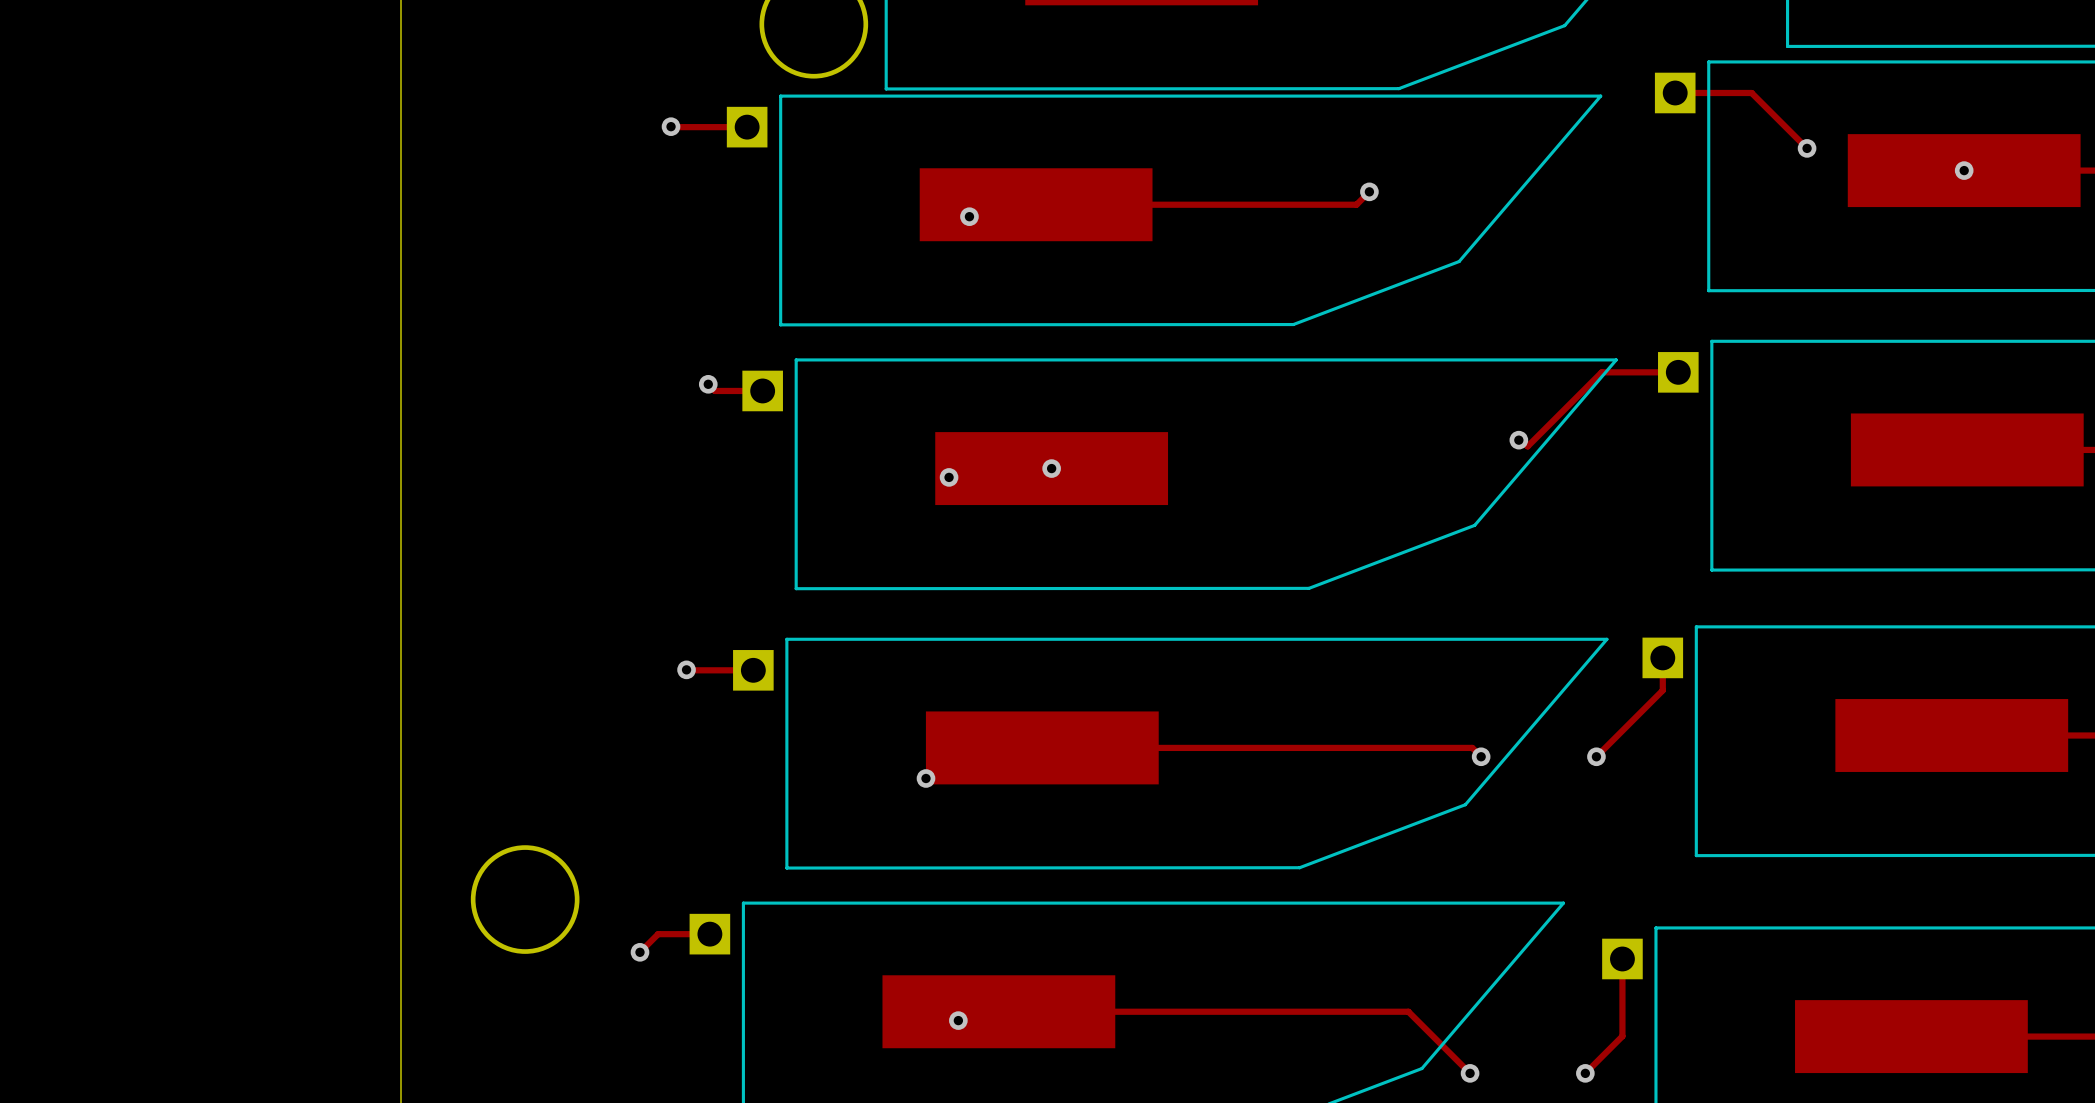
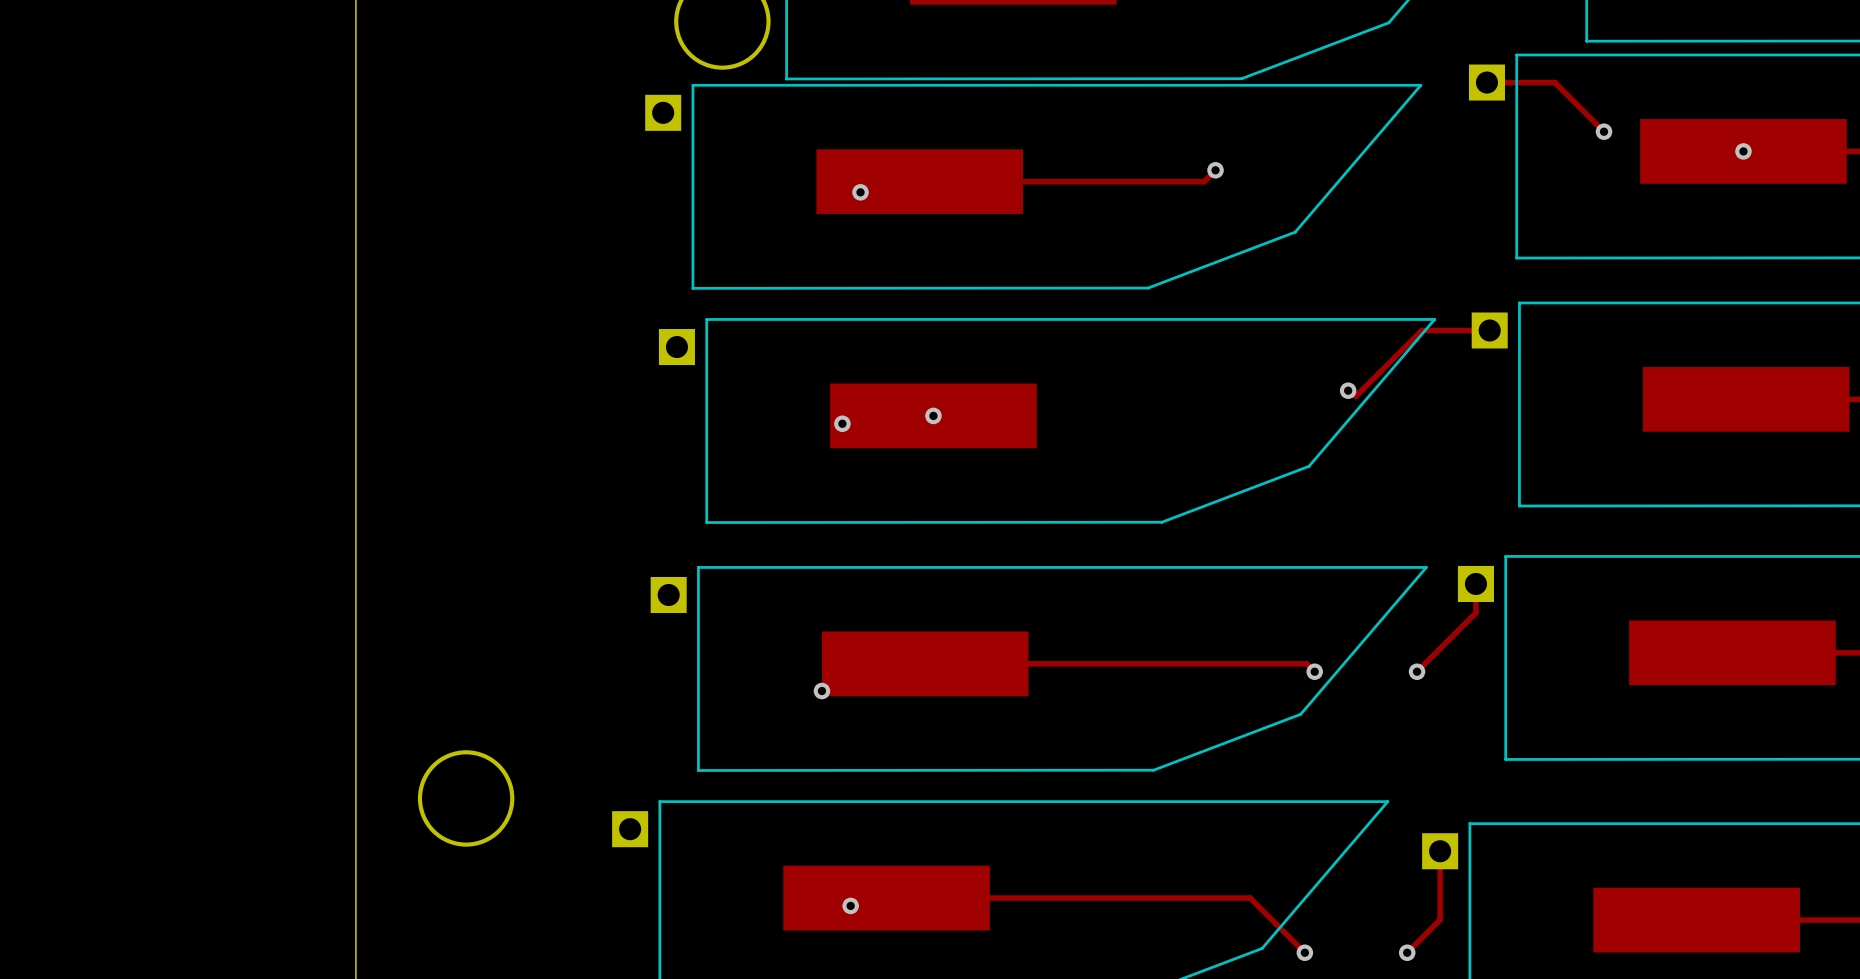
track: (671, 126) (747, 127) -> none
via: (671, 126) -> none
track: (708, 384) (714, 390) (762, 390) -> none
via: (708, 384) -> none
track: (686, 669) (753, 670) -> none
via: (686, 669) -> none
track: (709, 934) (658, 934) (639, 952) -> none
via: (639, 952) -> none

